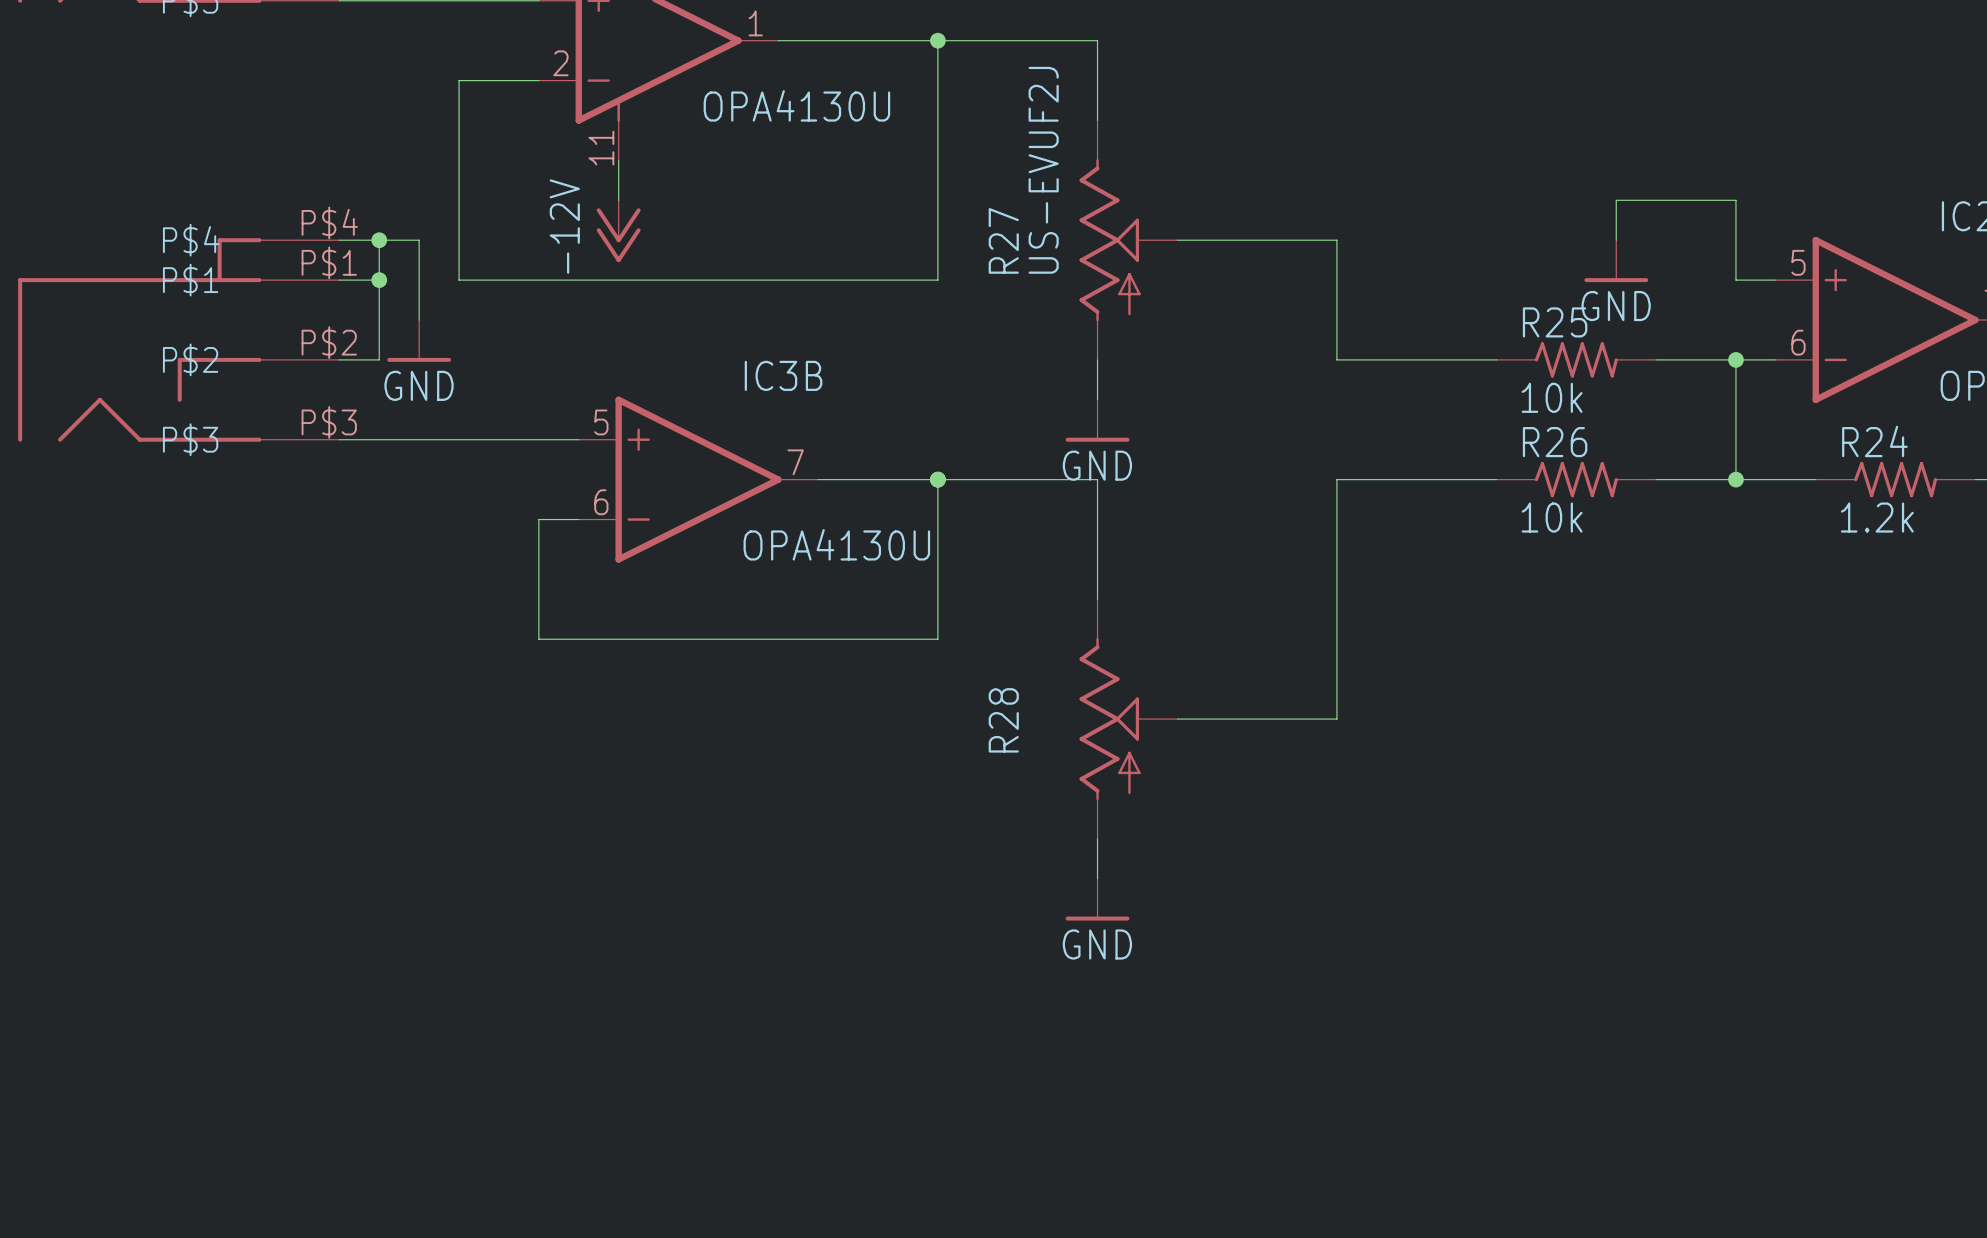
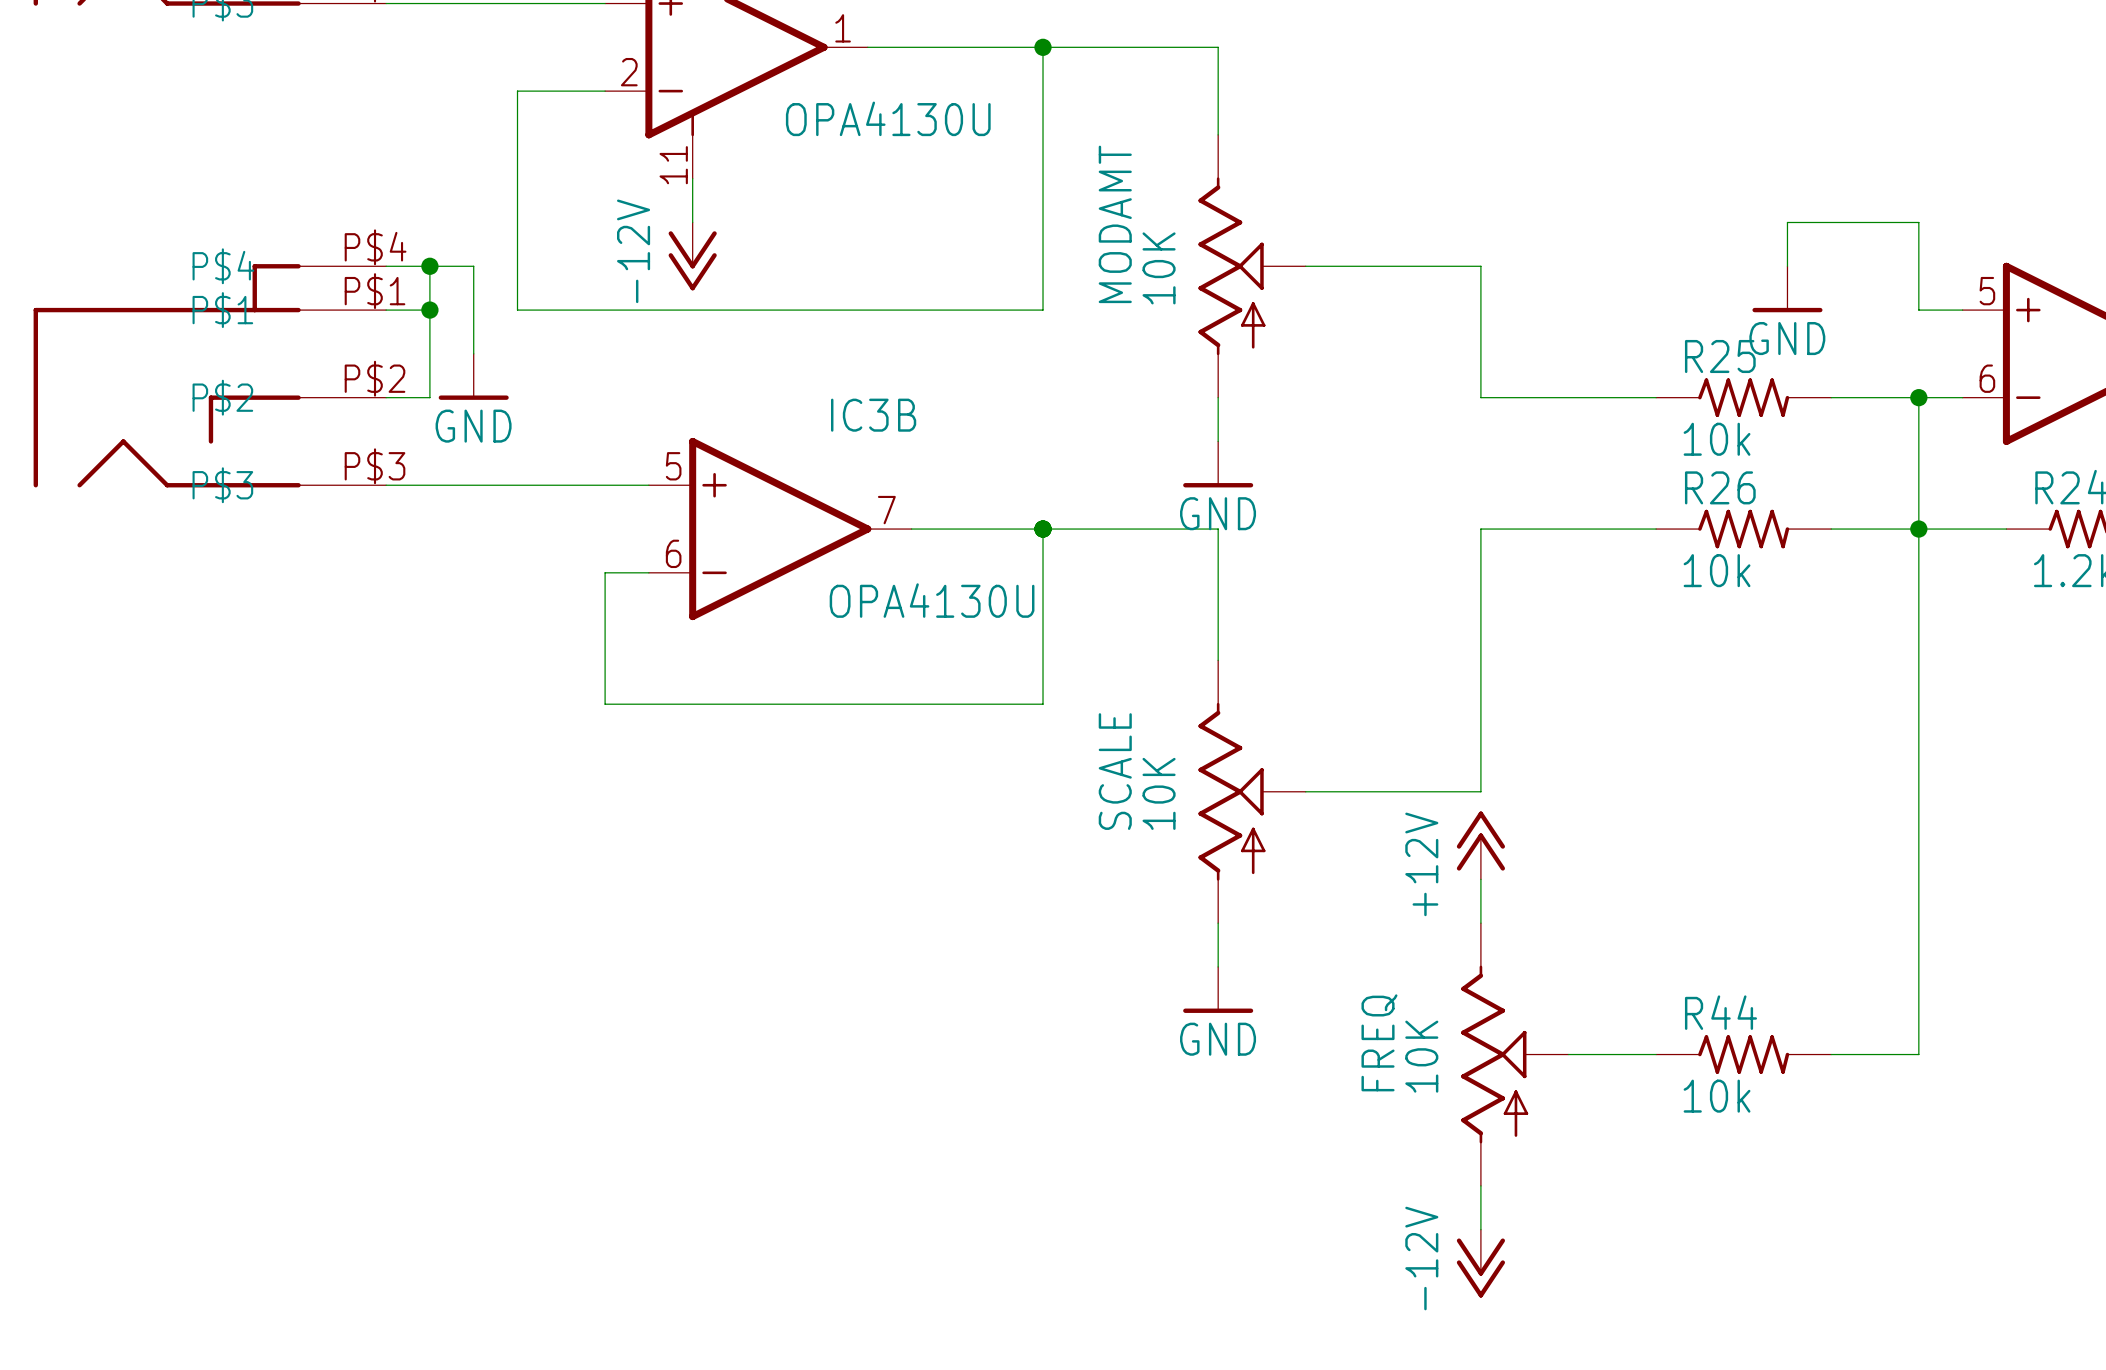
R27 value: US-EVUF2J (1043, 170) -> 10K (1159, 268)
R27 name: R27 (1003, 240) -> MODAMT (1115, 224)
wire: none -> (1918, 529) (1918, 1054) (1831, 1054)
R28 name: R28 (1003, 720) -> SCALE (1115, 771)
R28 value: none -> 10K (1159, 793)
power symbol: none -> +12V (1480, 845)
wire: none -> (1480, 879) (1480, 923)
FREQ: none -> 10K (1514, 1054)
wire: none -> (1568, 1054) (1656, 1054)
R44: none -> 10k (1743, 1054)
wire: none -> (1480, 1185) (1480, 1229)
power symbol: none -> -12V (1480, 1263)

